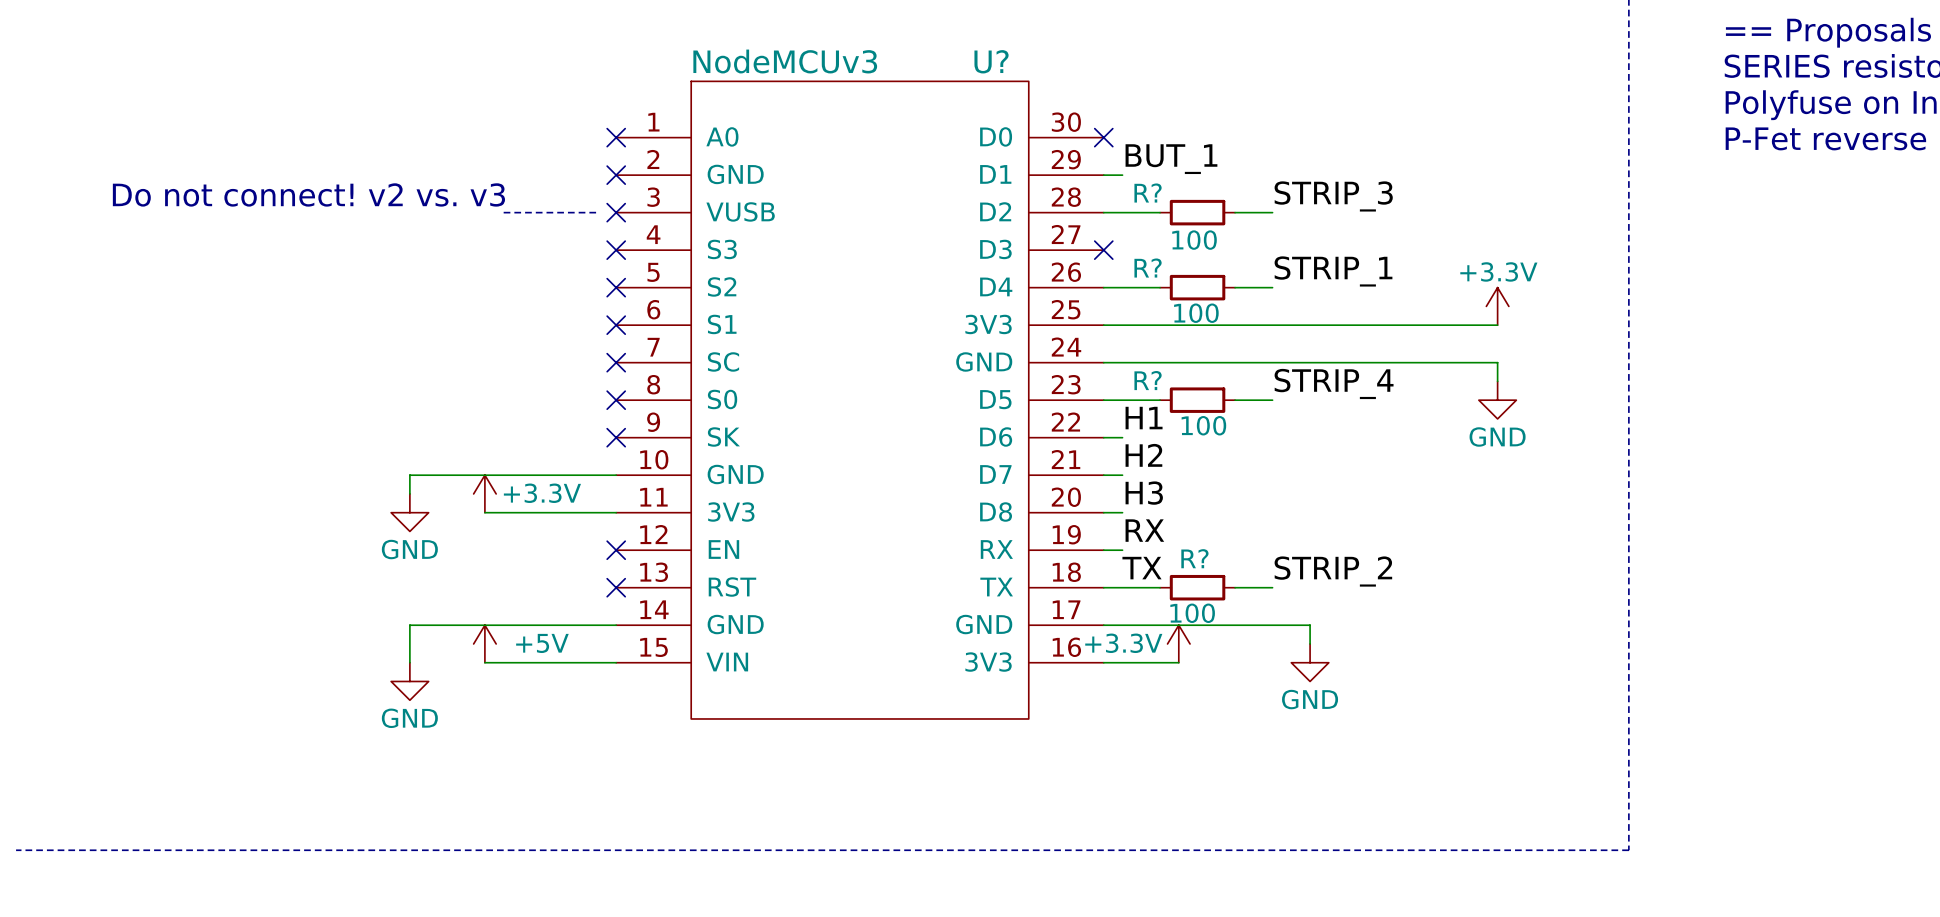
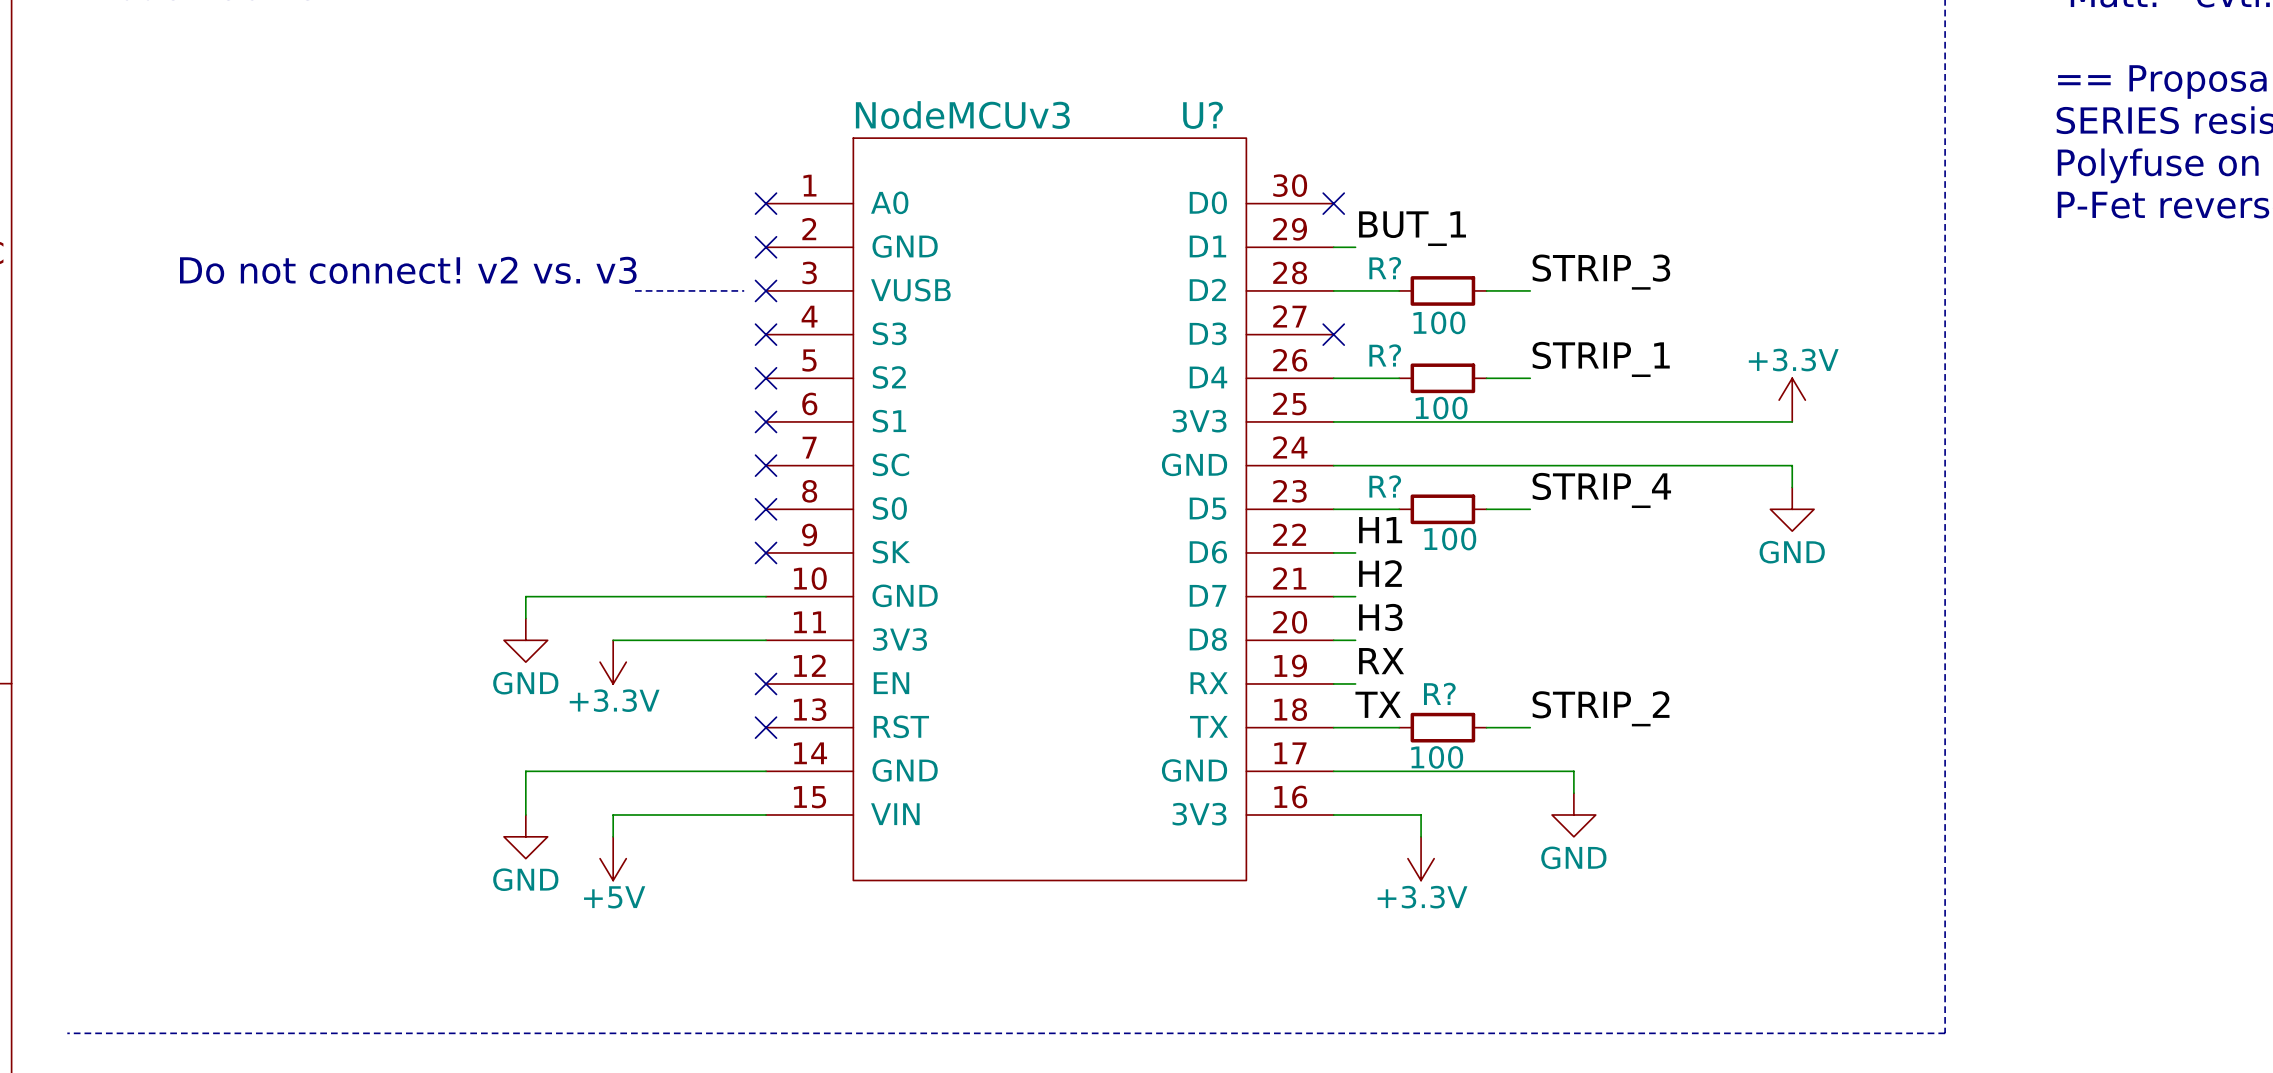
power symbol rotation: 0° (484, 493) -> 180° (613, 662)
power symbol position: +3.3V (484, 493) -> +3.3V (613, 662)
power symbol text position: +3.3V (542, 493) -> +3.3V (614, 700)
power symbol rotation: 0° (484, 643) -> 180° (613, 858)
power symbol position: +5V (484, 643) -> +5V (613, 858)
power symbol text position: +5V (542, 643) -> +5V (614, 897)
power symbol text position: +3.3V (1123, 643) -> +3.3V (1422, 897)
power symbol rotation: 0° (1178, 643) -> 180° (1421, 858)
power symbol position: +3.3V (1178, 643) -> +3.3V (1421, 858)
wire: none -> (613, 814) (613, 836)
wire: none -> (1421, 814) (1421, 836)

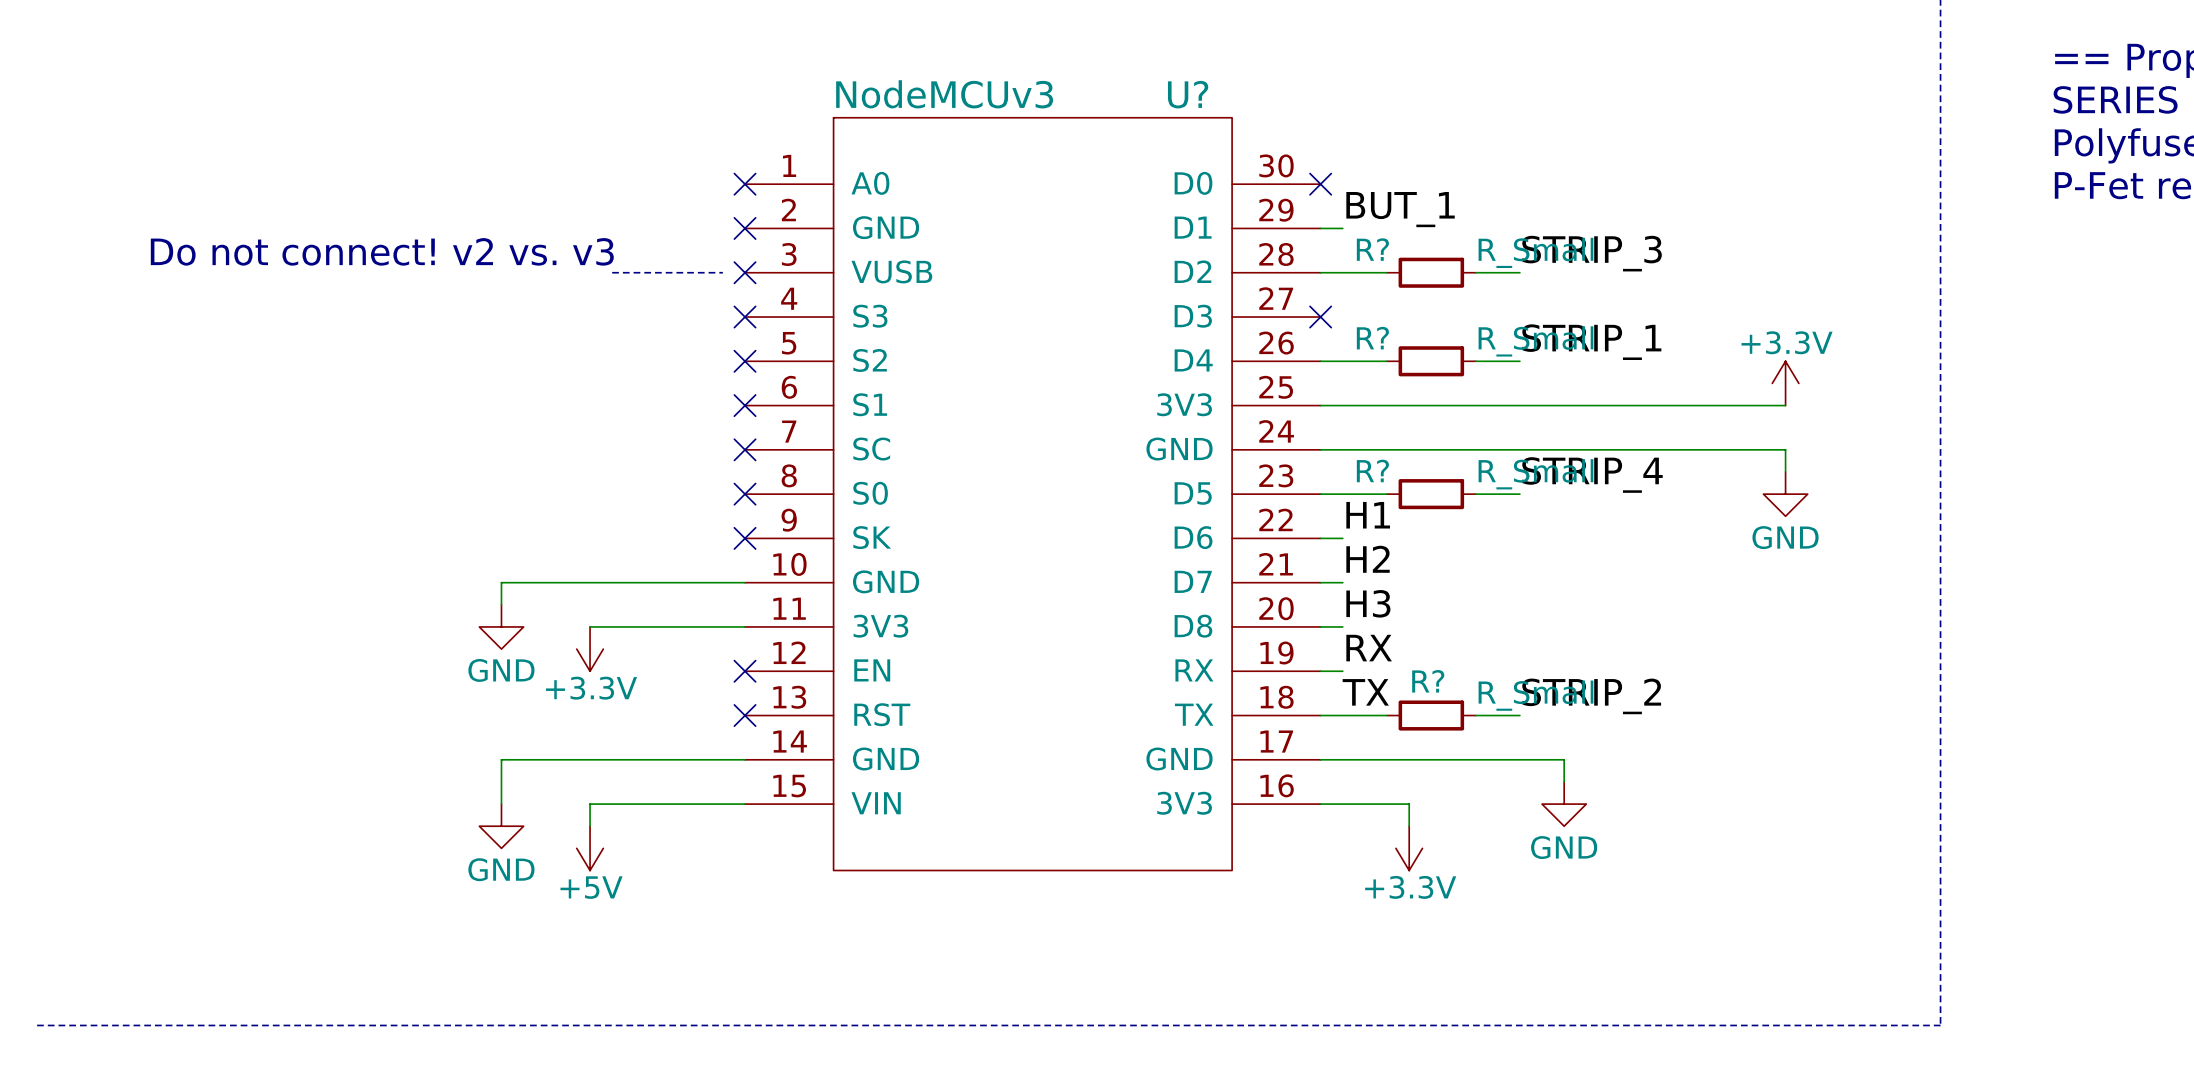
R? value: 100 (1439, 322) -> R_Small (1535, 252)
R? value: 100 (1441, 408) -> R_Small (1535, 341)
R? value: 100 (1450, 539) -> R_Small (1535, 474)
R? value: 100 (1437, 757) -> R_Small (1535, 695)

